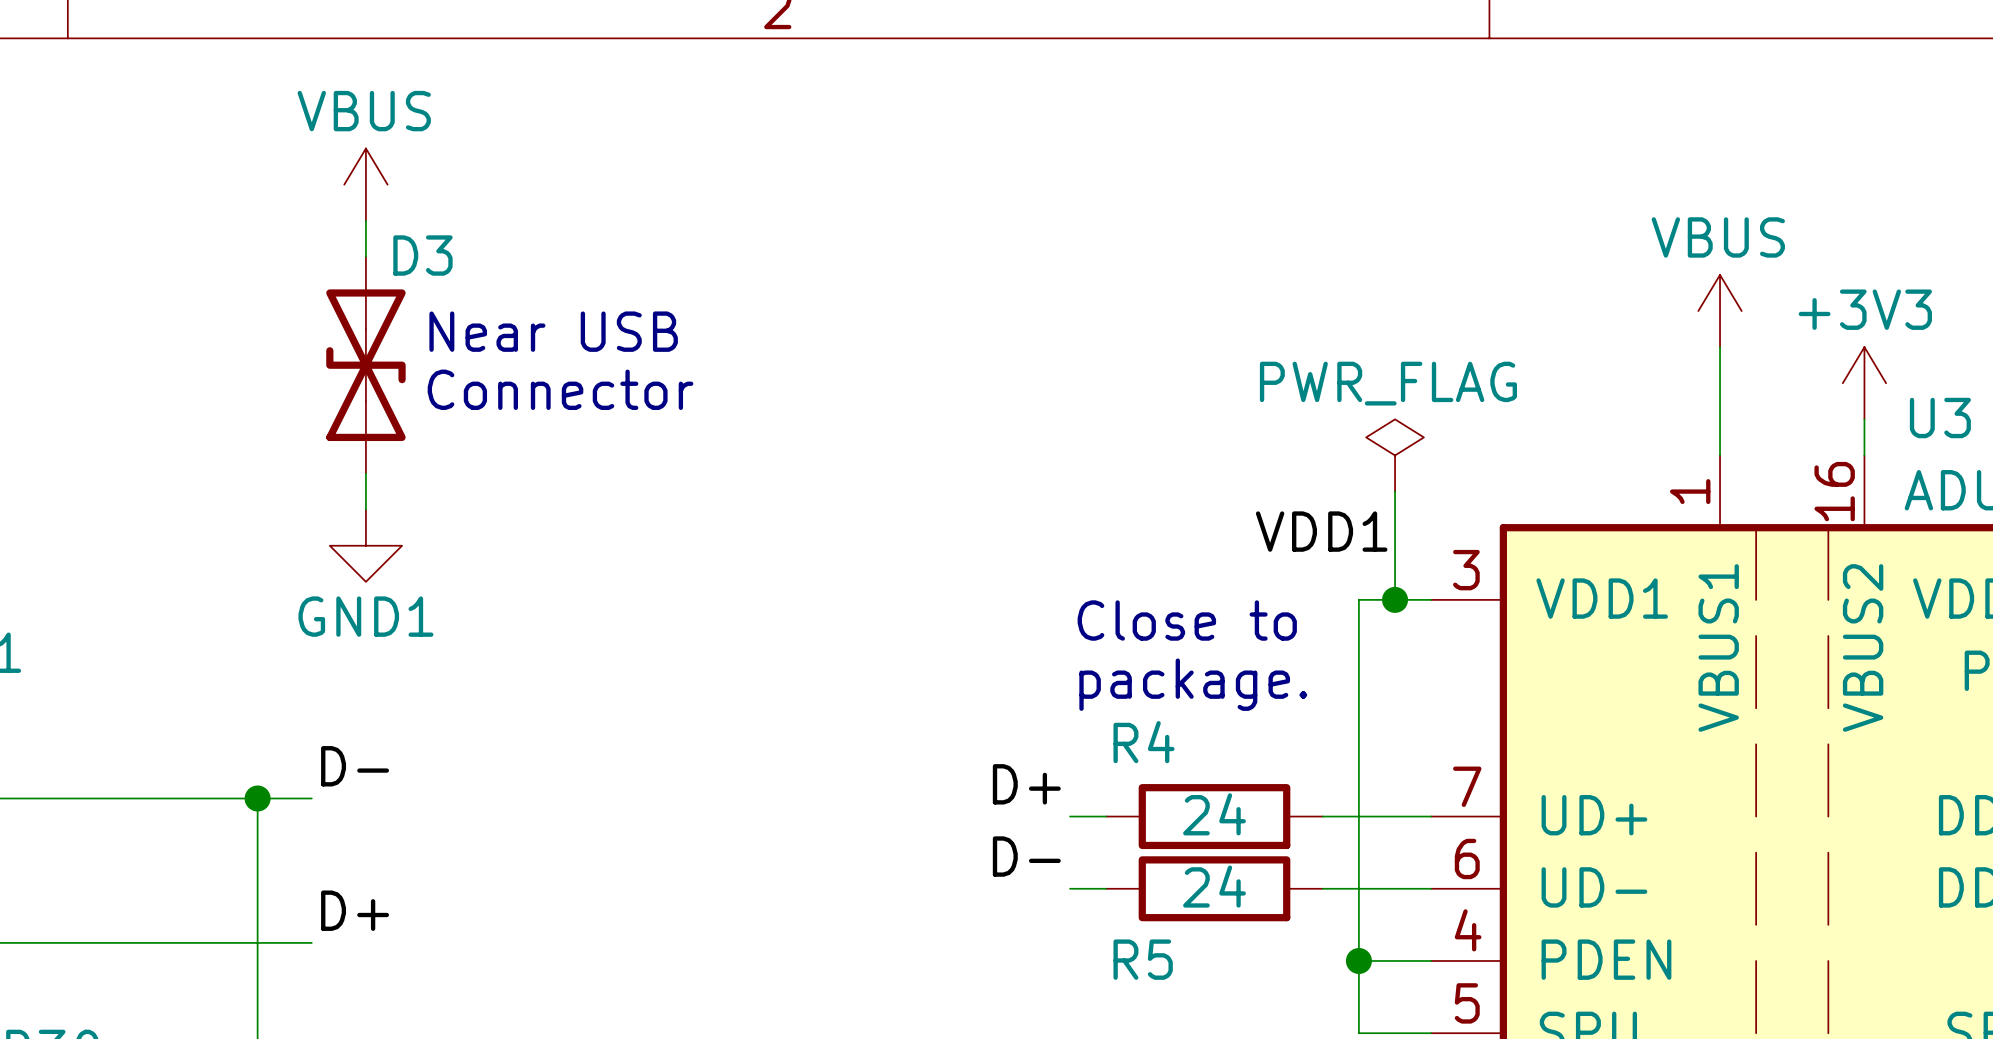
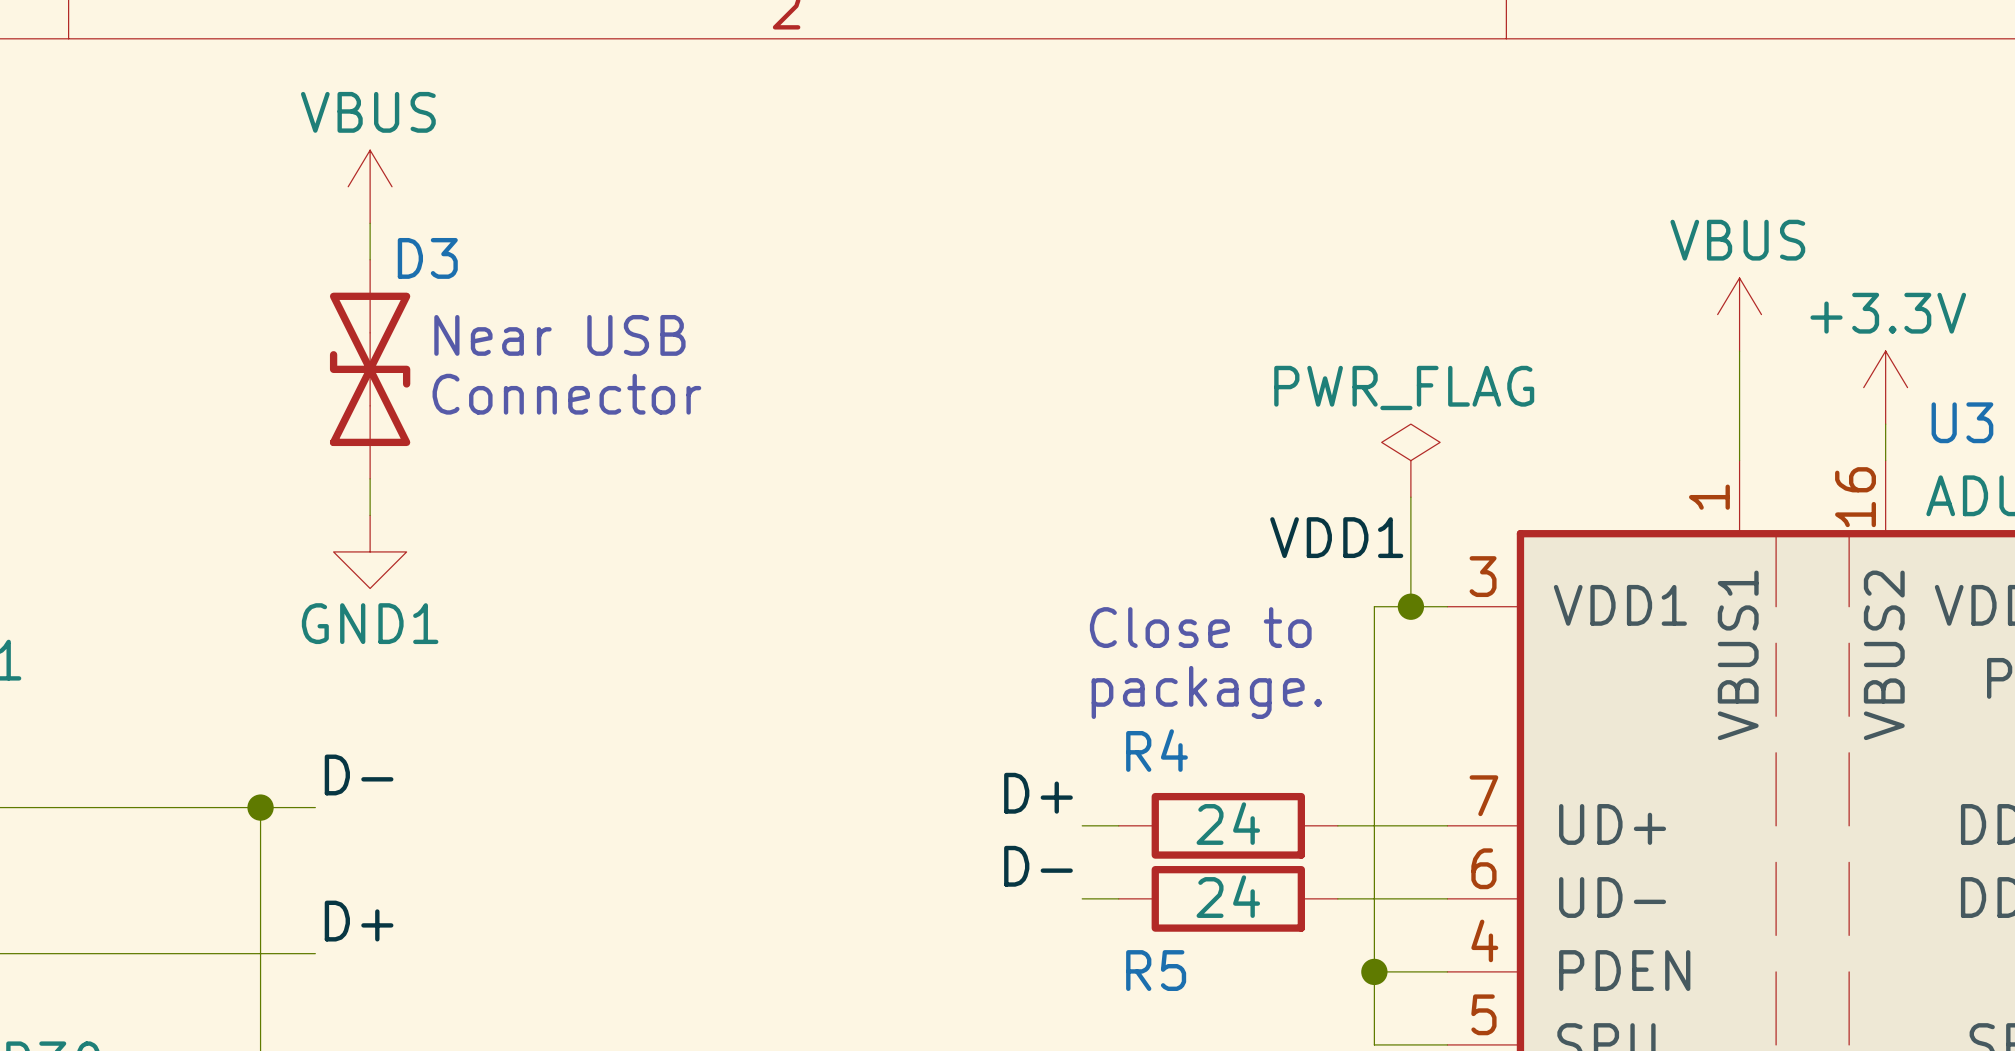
power symbol: +3V3 (1864, 383) -> +3.3V (1885, 387)

